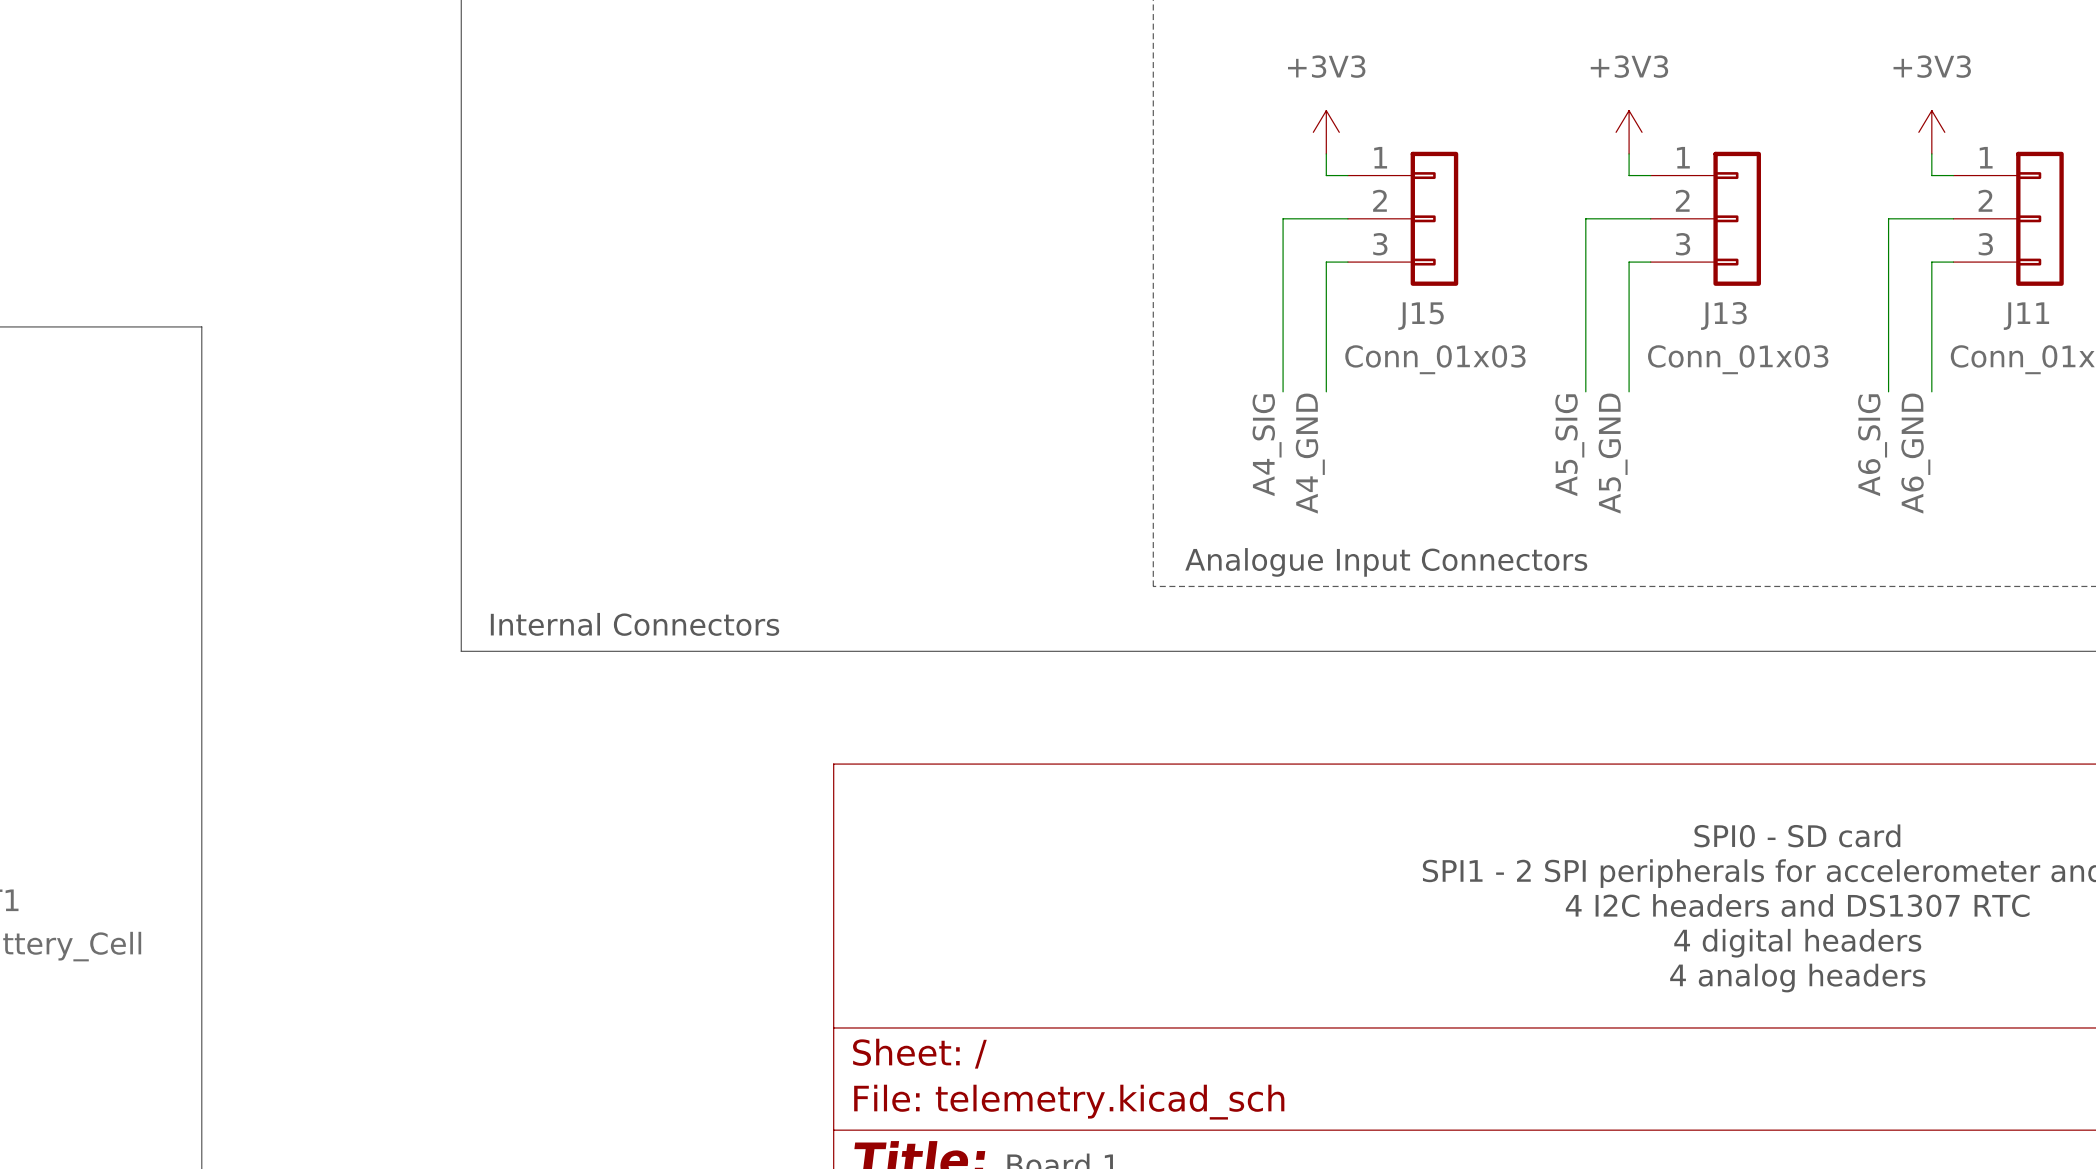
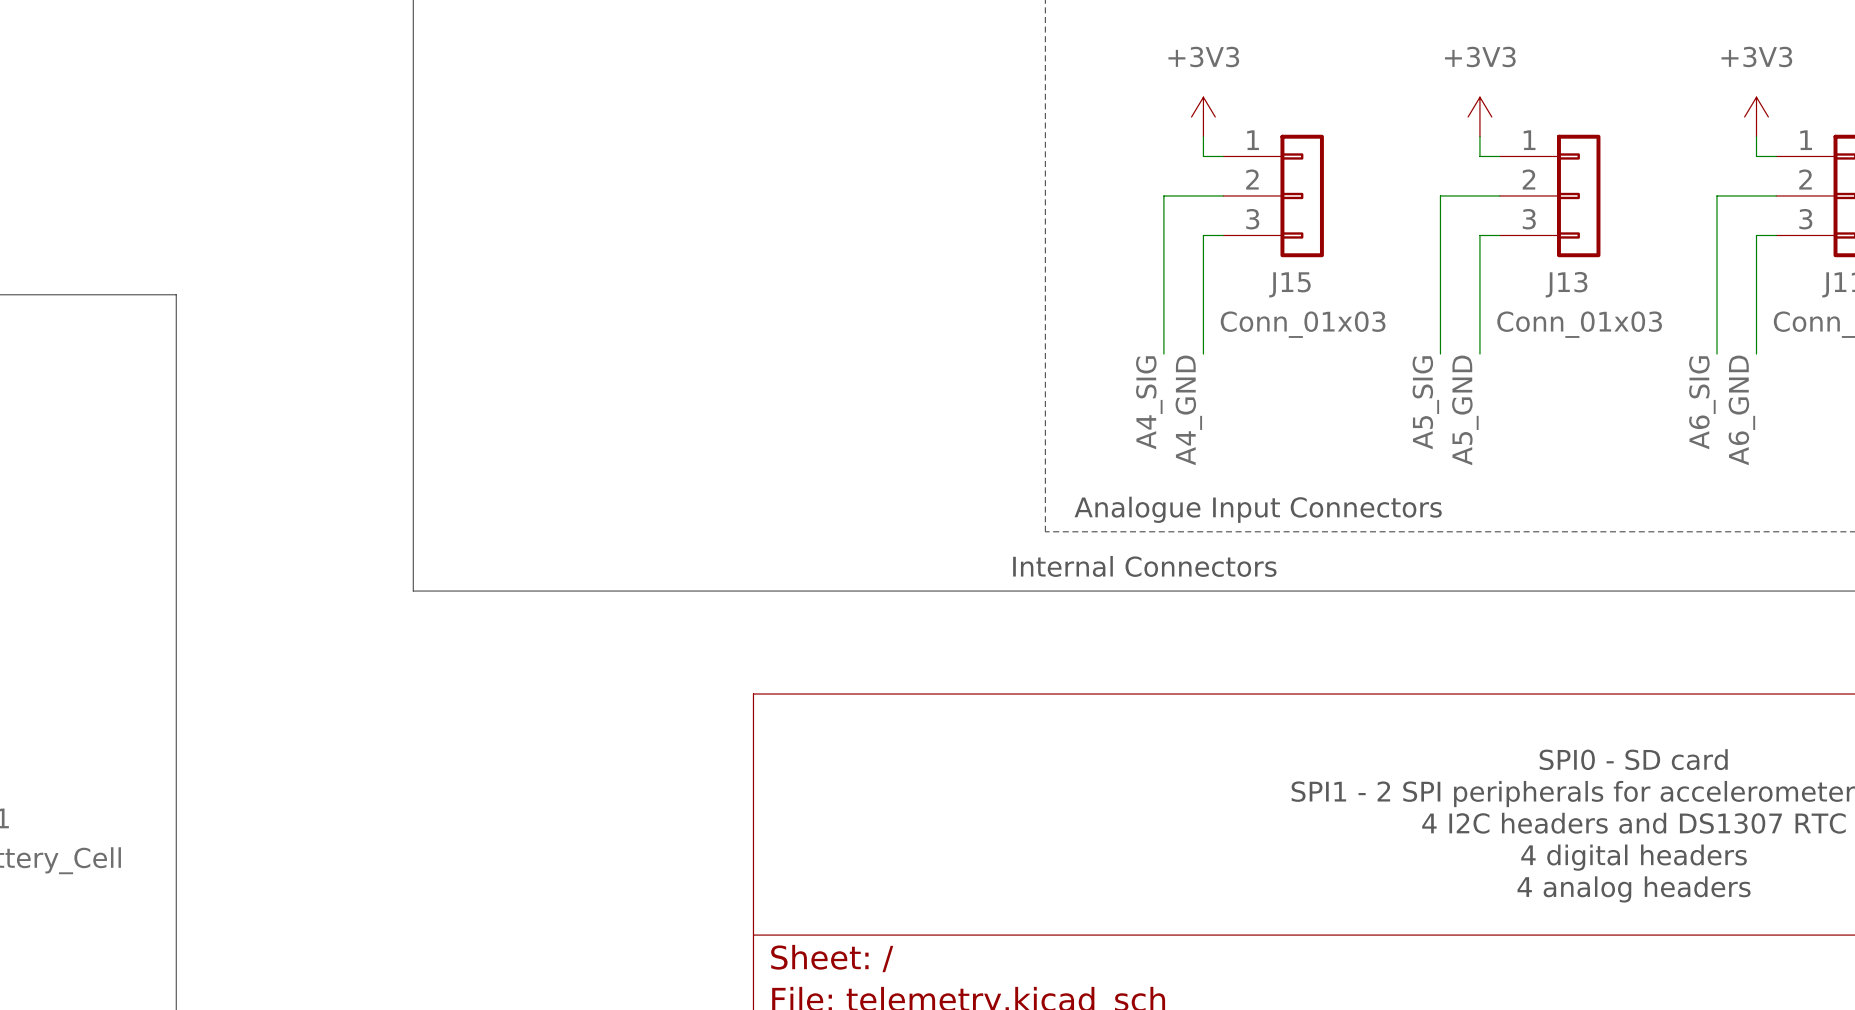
text: Internal Connectors (635, 624) -> none
text: none -> Internal Connectors (1144, 566)

